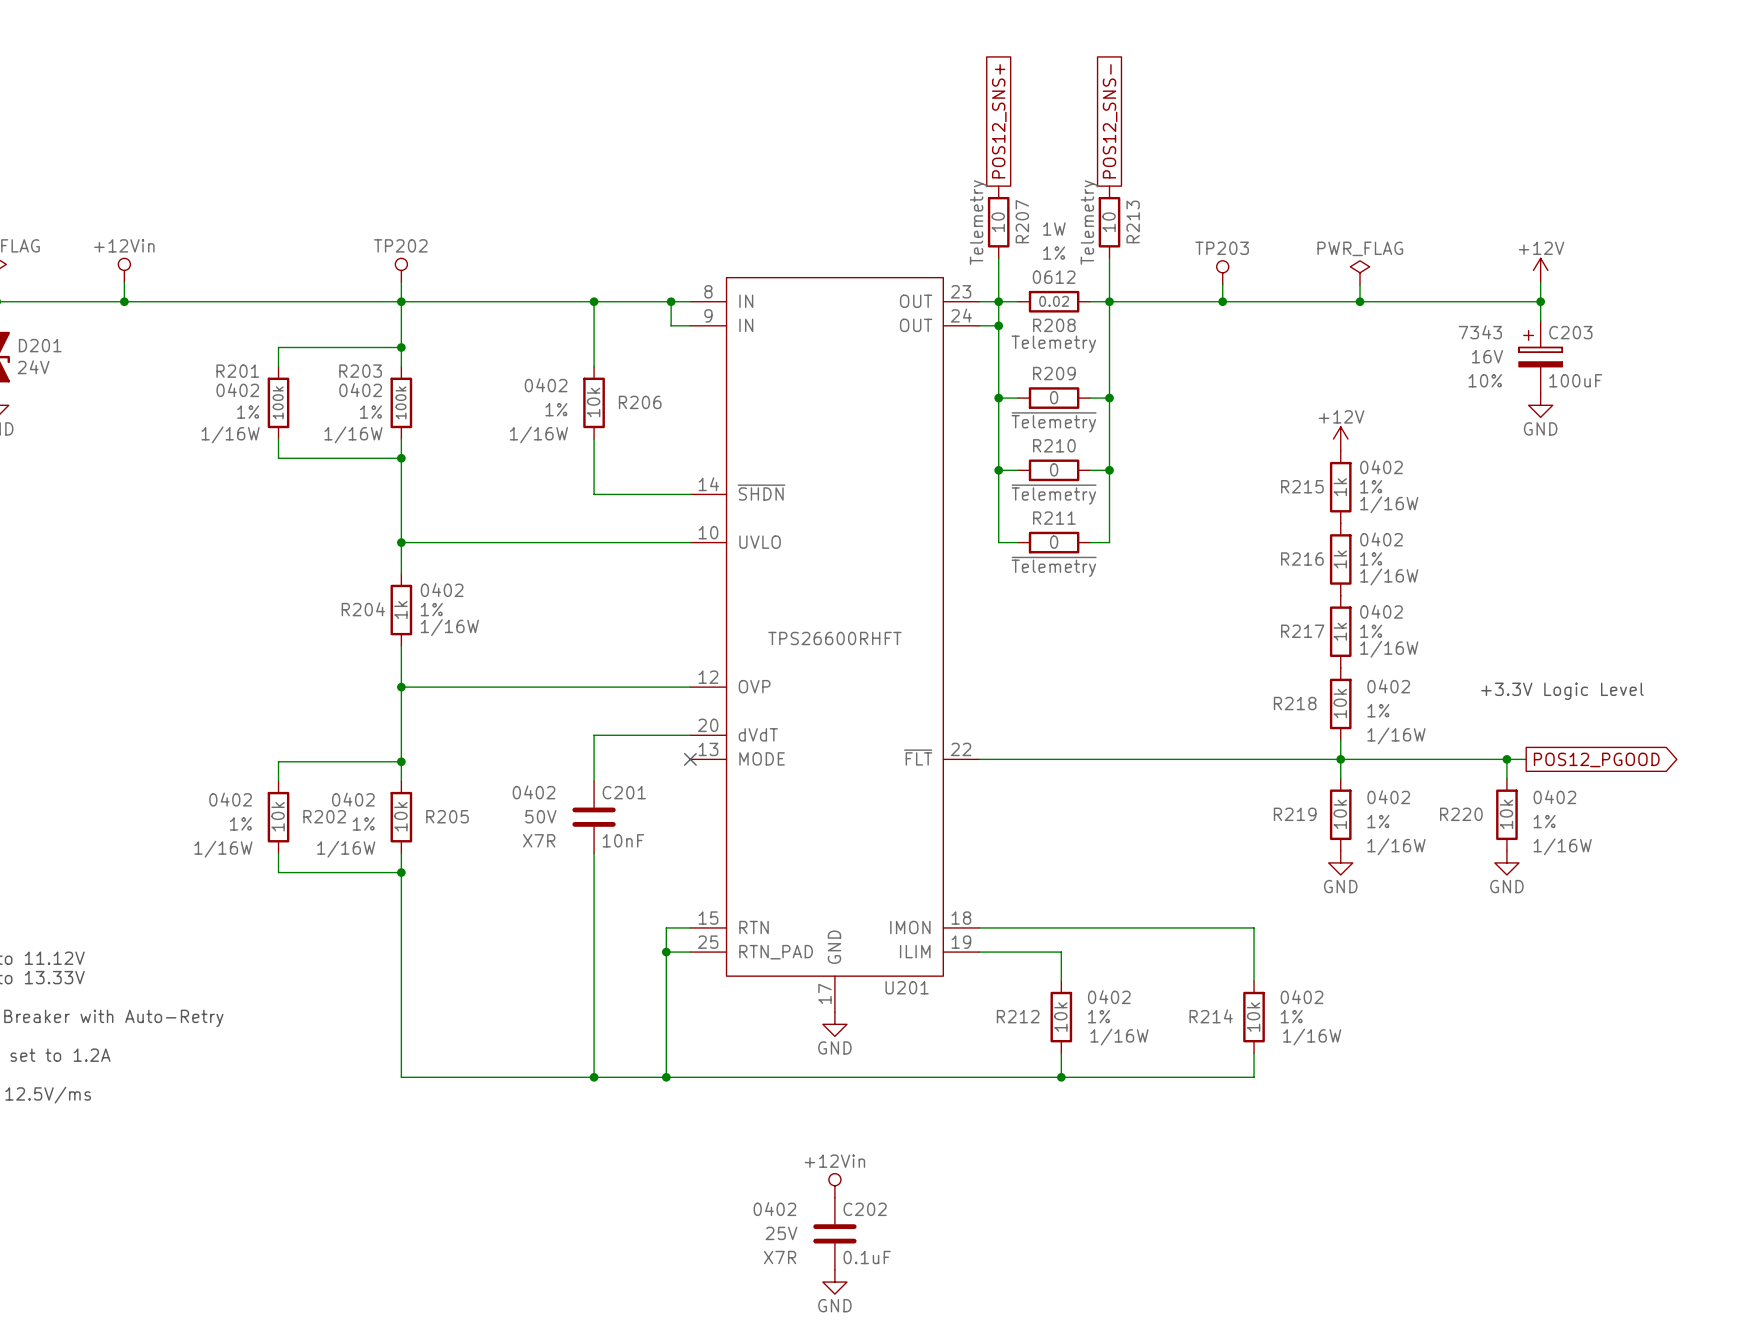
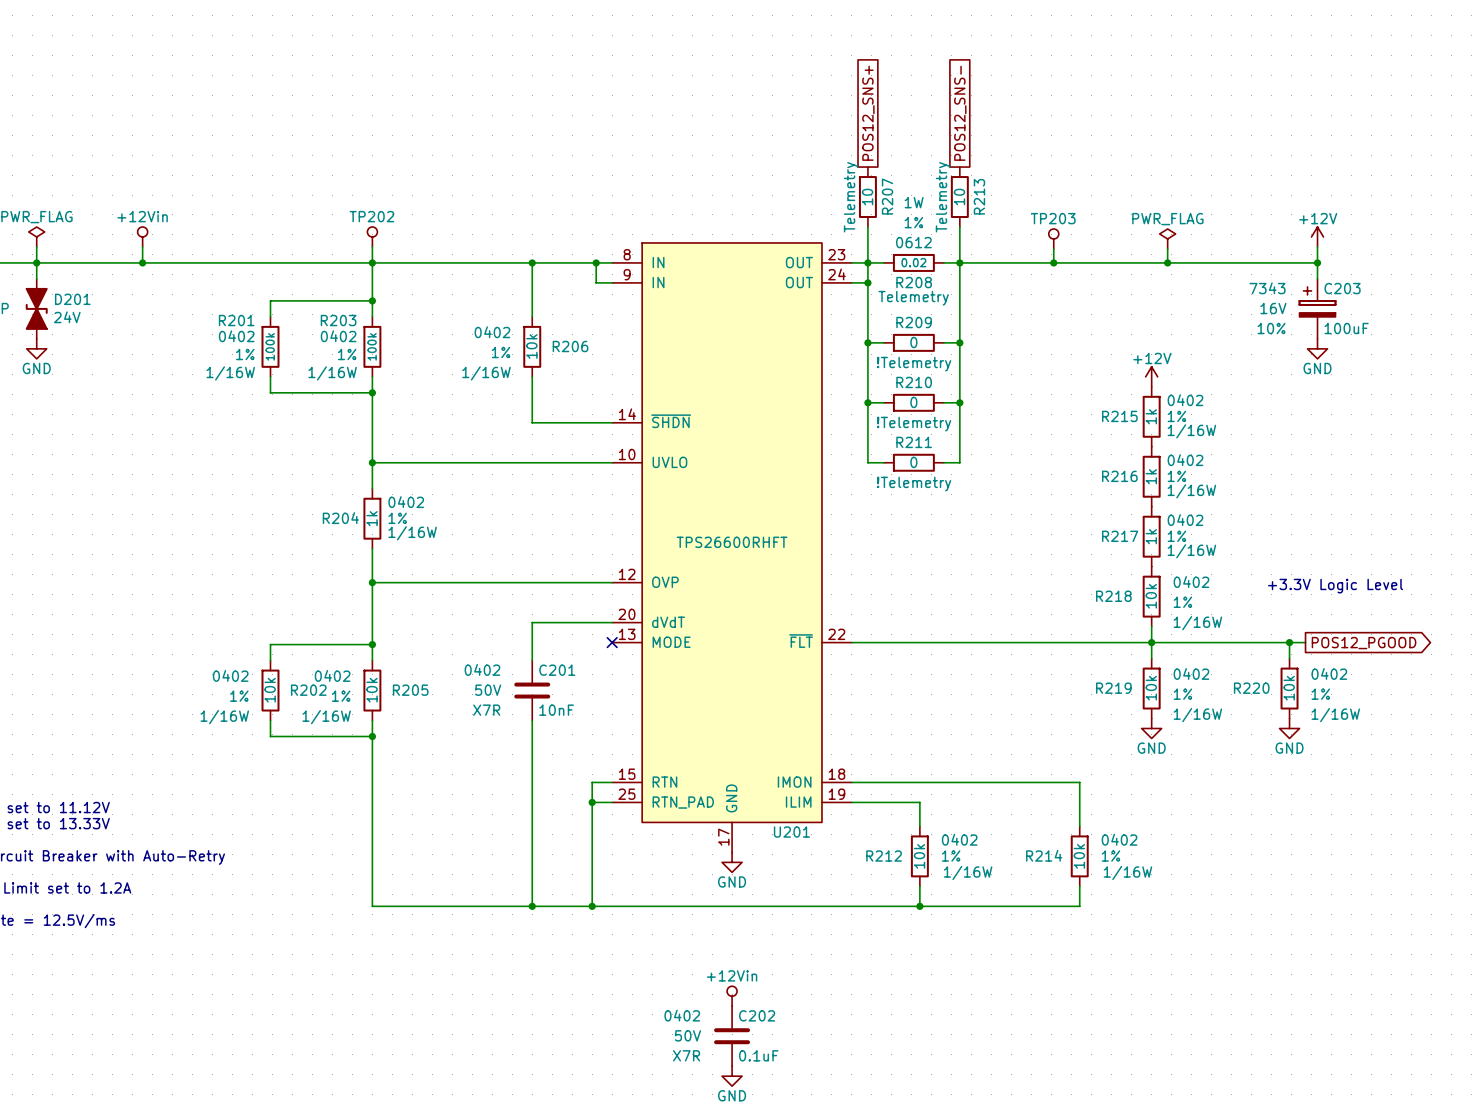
R209 text: ~{Telemetry} (1054, 422) -> !Telemetry (914, 364)
R210 text: ~{Telemetry} (1054, 494) -> !Telemetry (914, 424)
R211 text: ~{Telemetry} (1054, 566) -> !Telemetry (914, 484)
C202 text: 25V (781, 1233) -> 50V (687, 1035)

